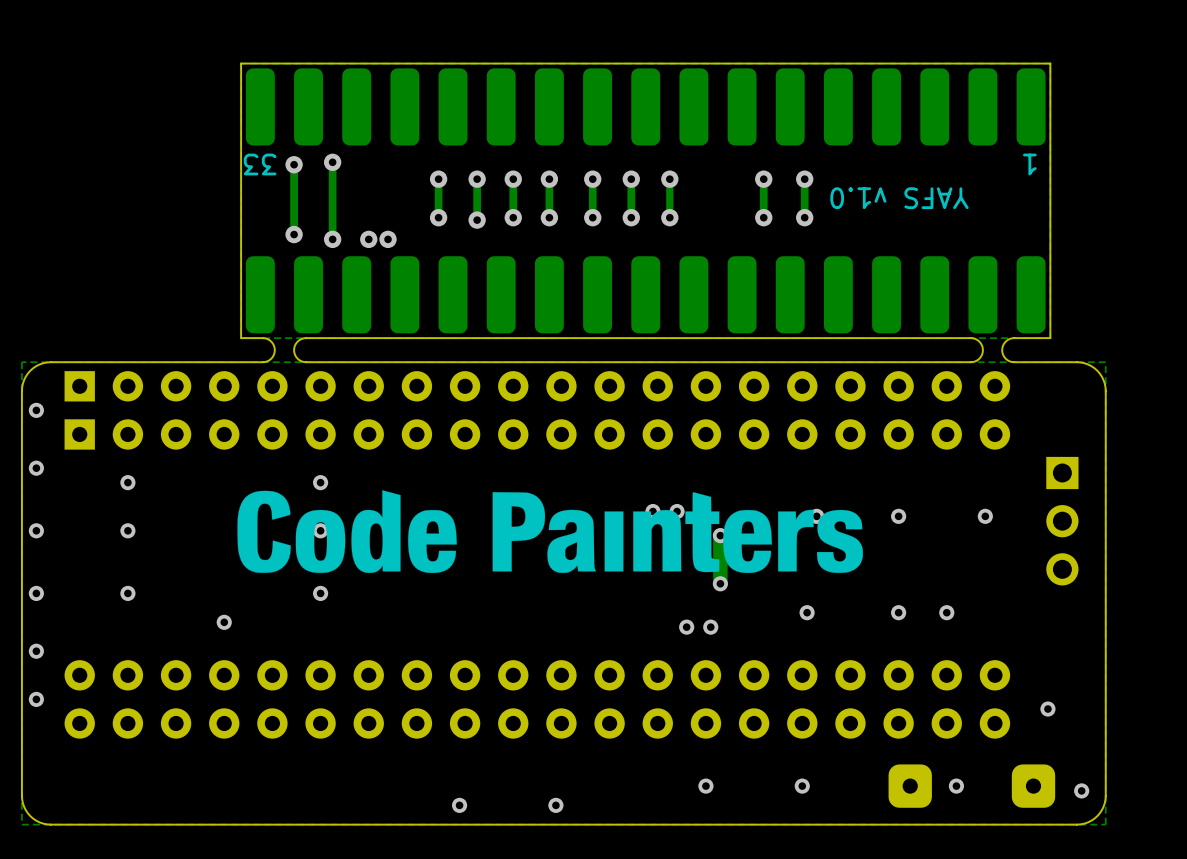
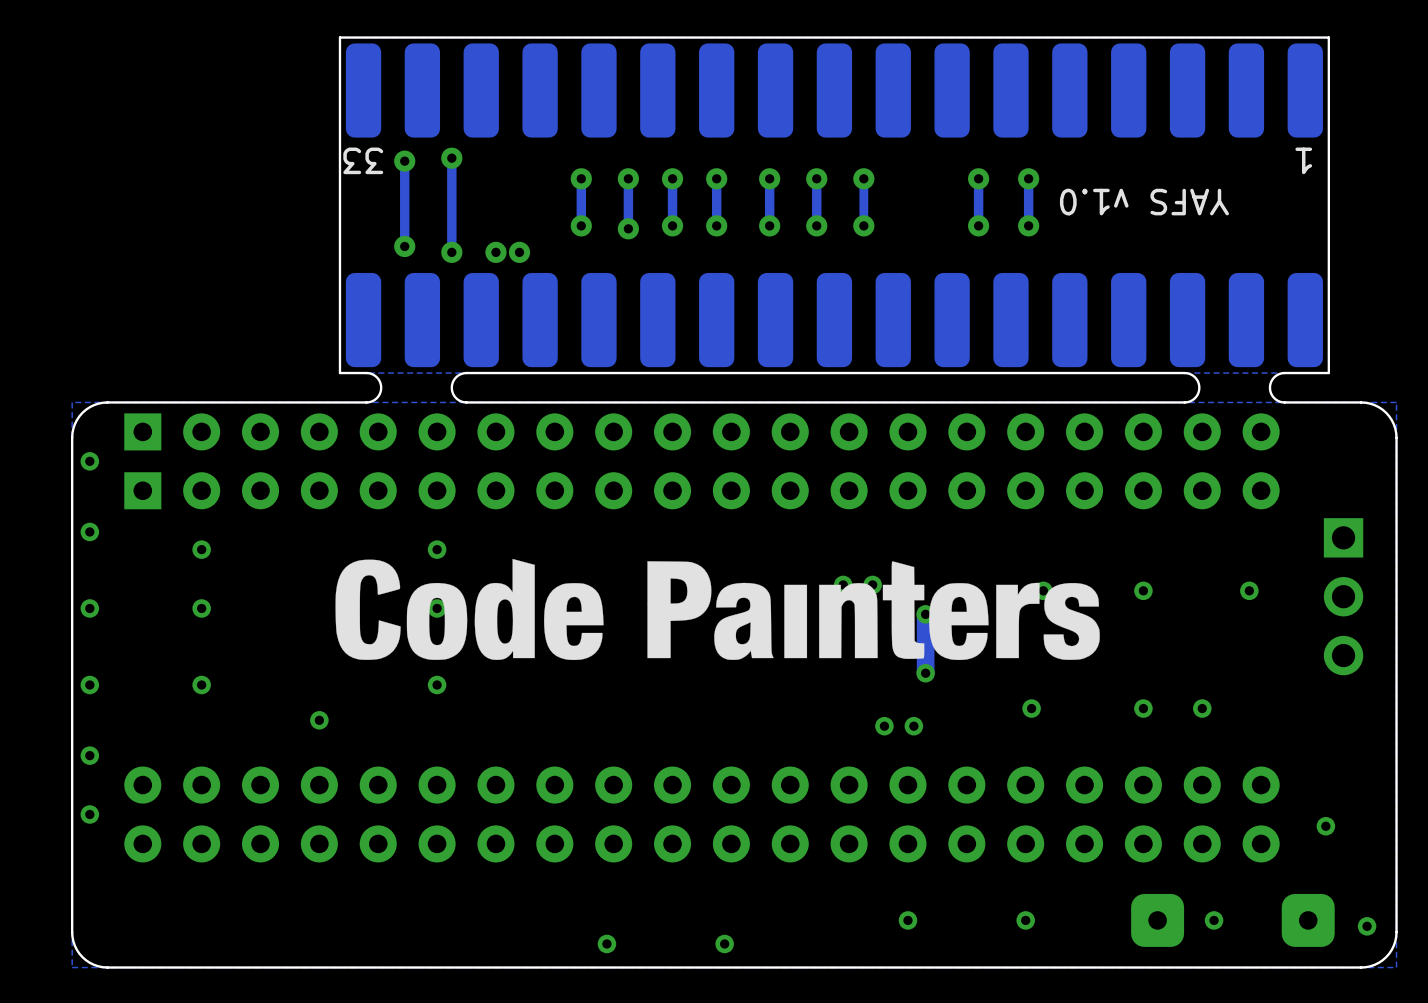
board edge: (344, 338) (303, 338) (296, 342) (294, 350) (296, 357) (303, 361) (344, 362) -> (466, 373) (456, 377) (451, 387) (456, 398) (466, 402)
board edge: (932, 338) (973, 338) (980, 342) (982, 350) (980, 357) (973, 361) (932, 362) -> (1184, 373) (1195, 377) (1199, 387) (1195, 398) (1184, 402)

